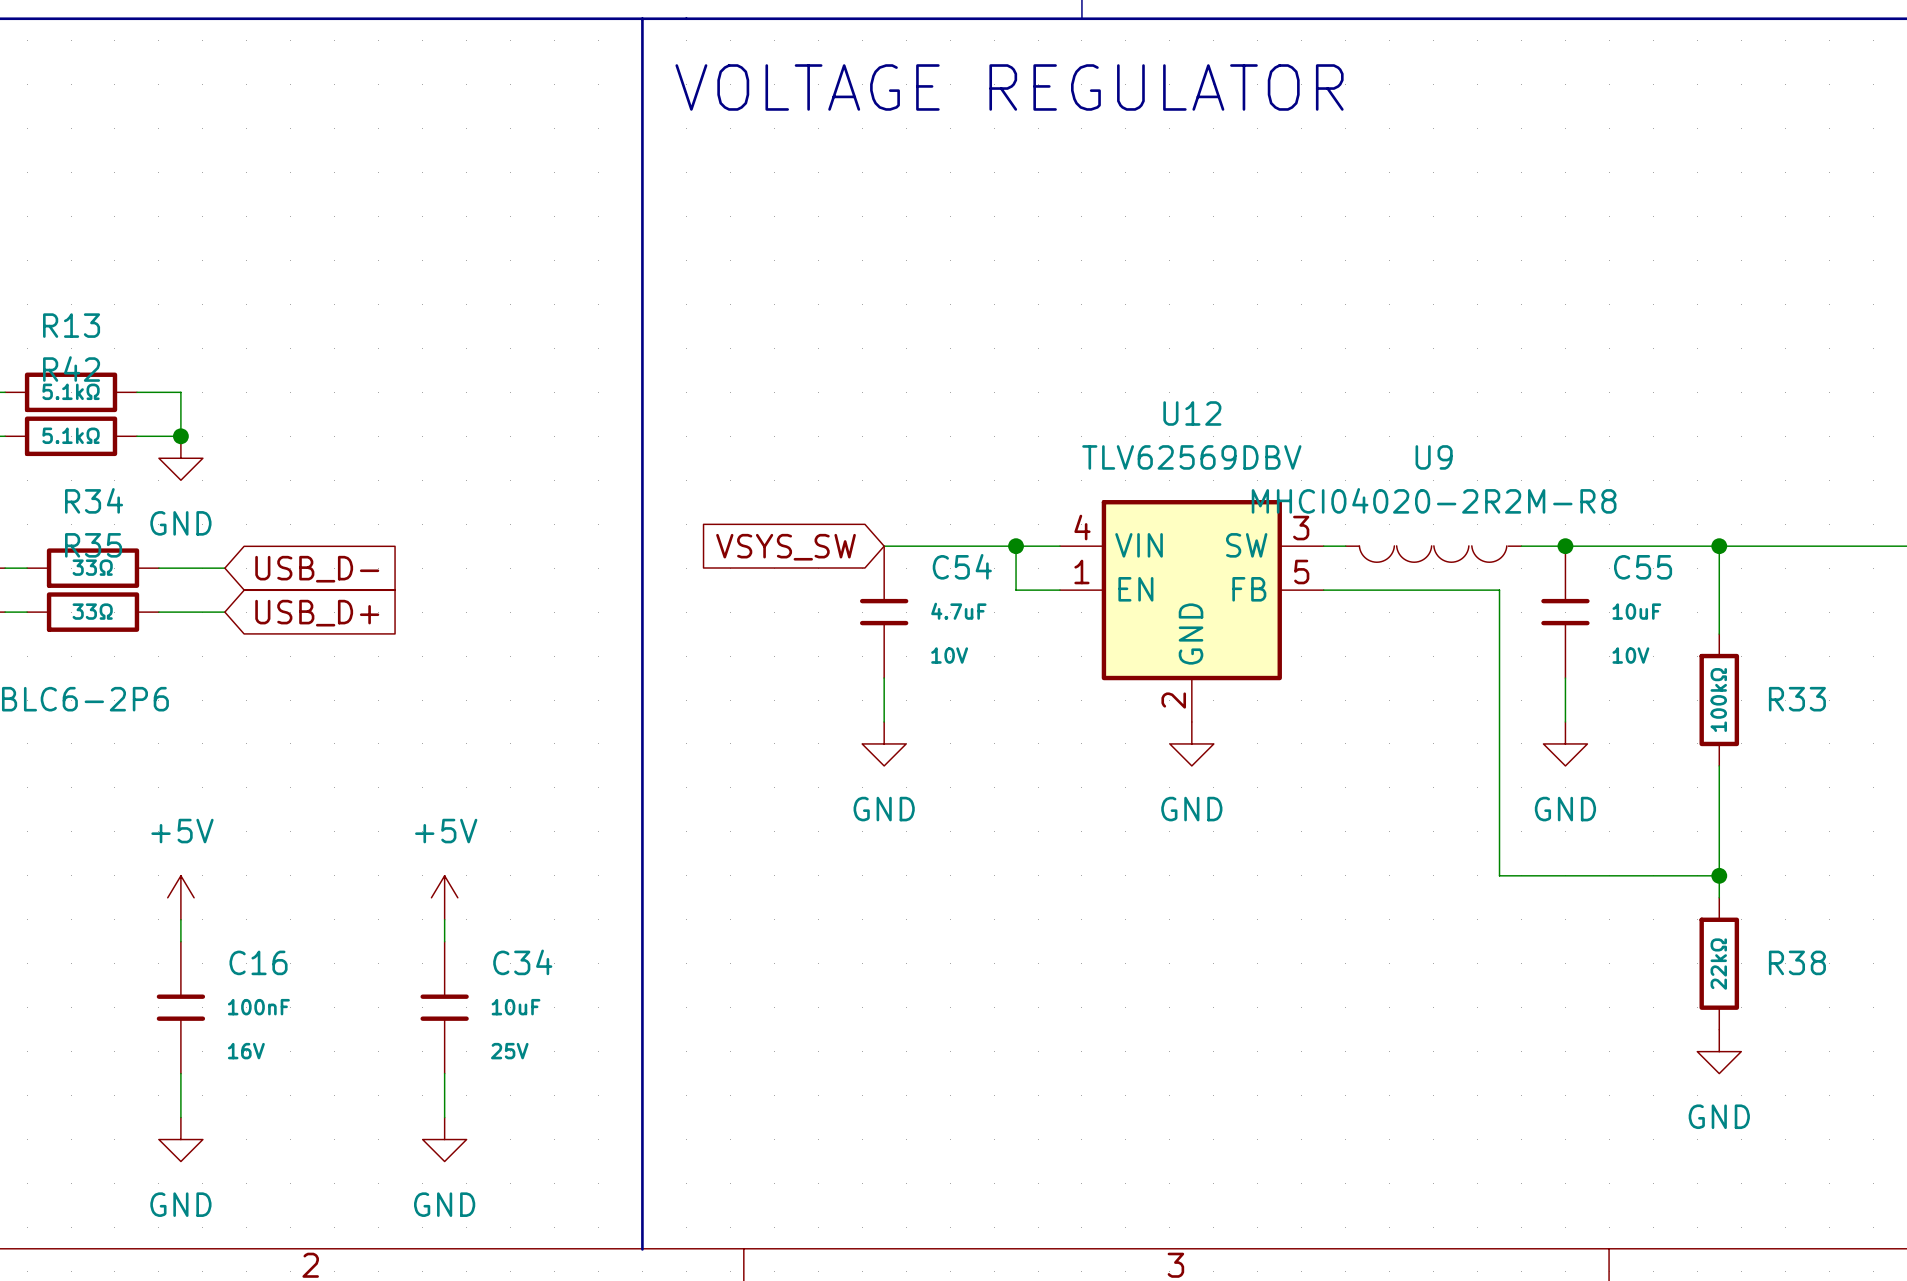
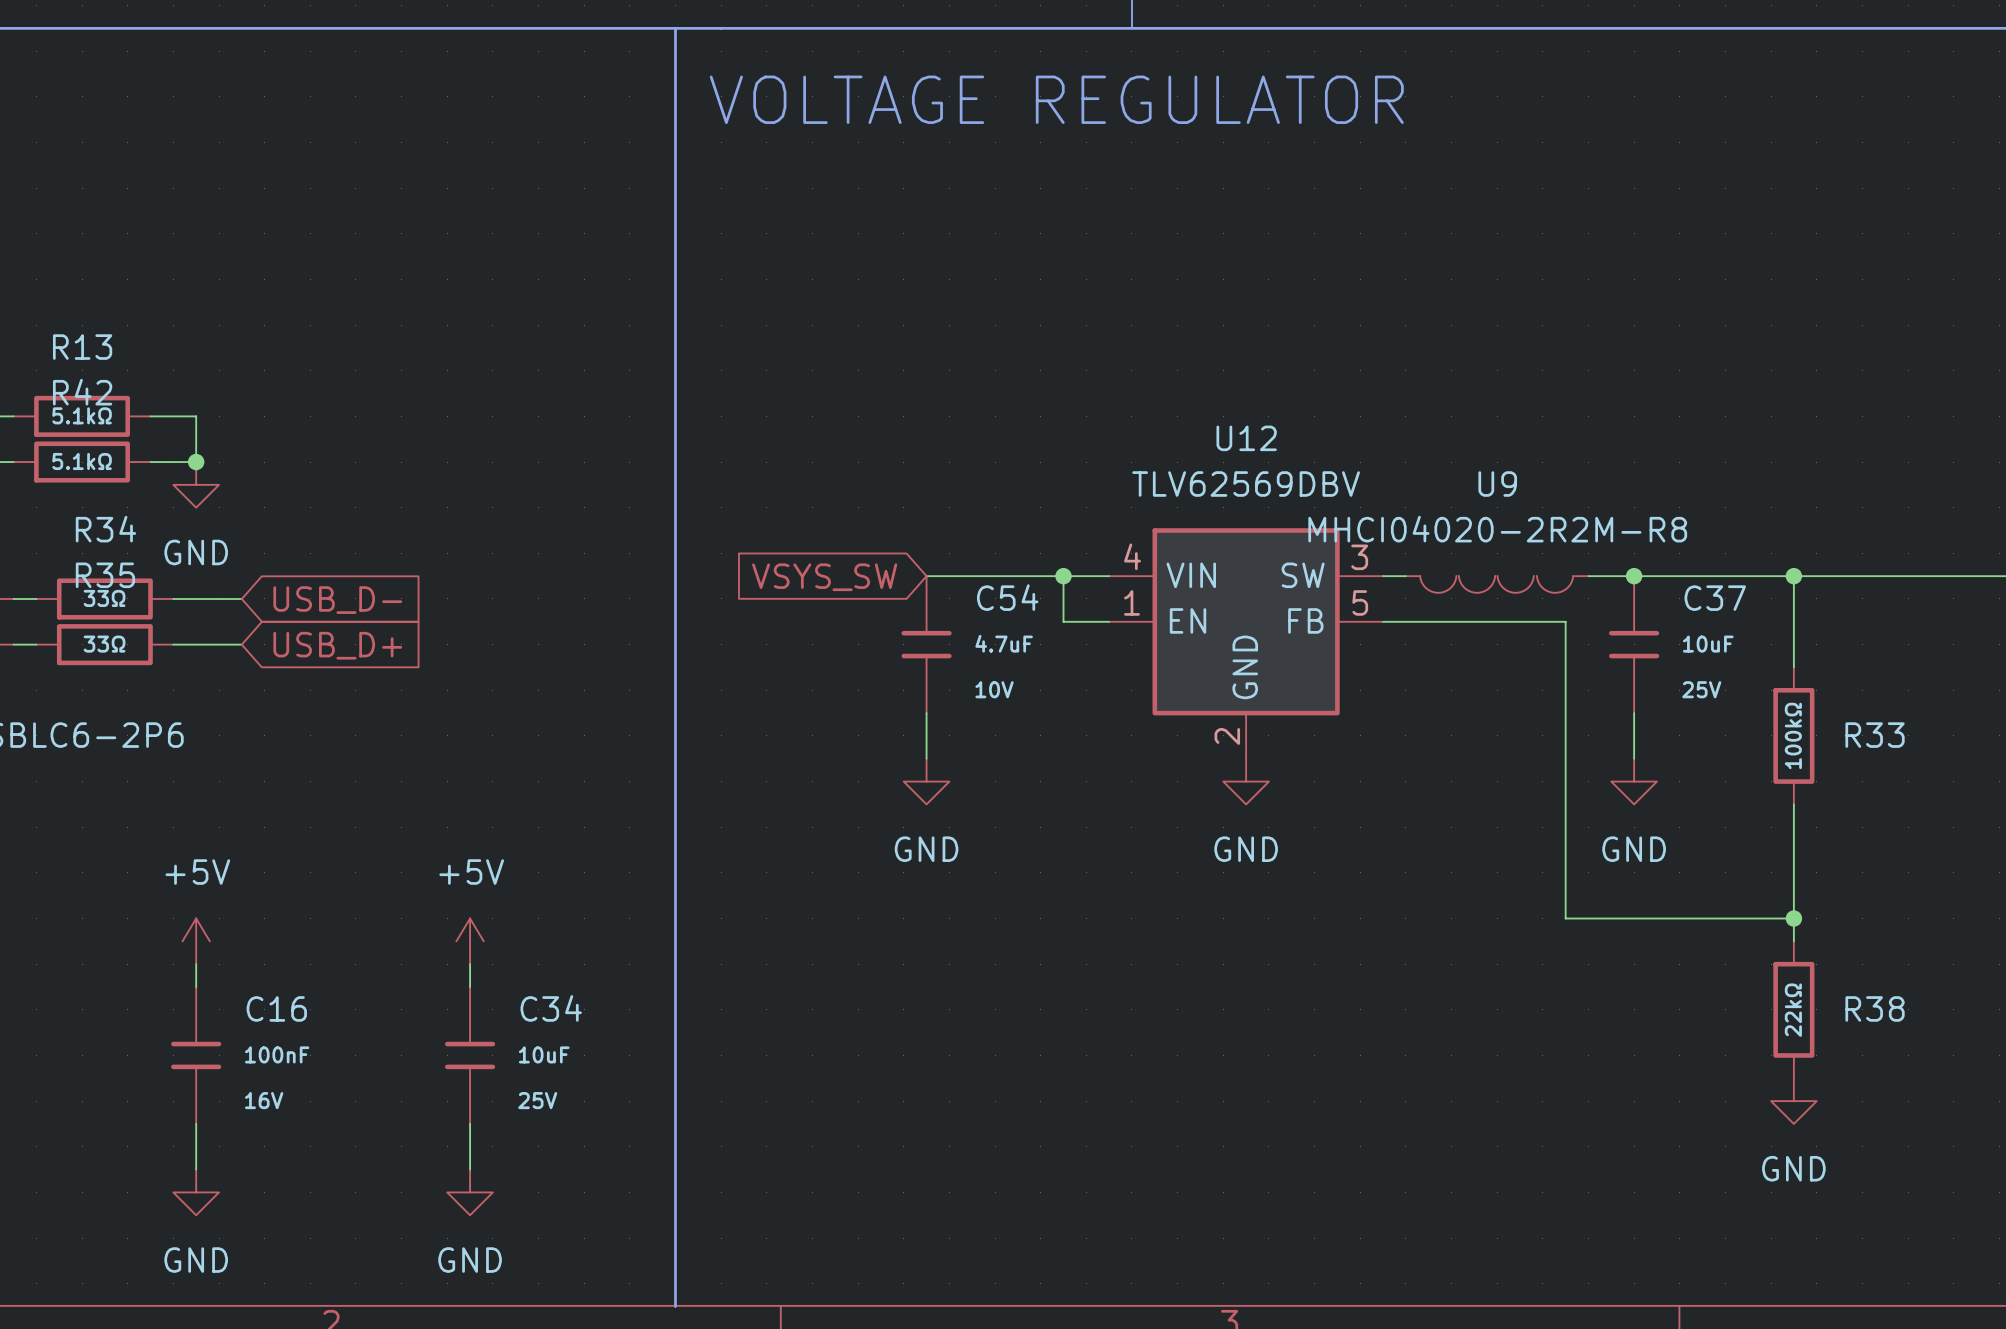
C55 name: C55 (1643, 567) -> C37 (1715, 598)
C55 text: 10V (1630, 655) -> 25V (1701, 689)

